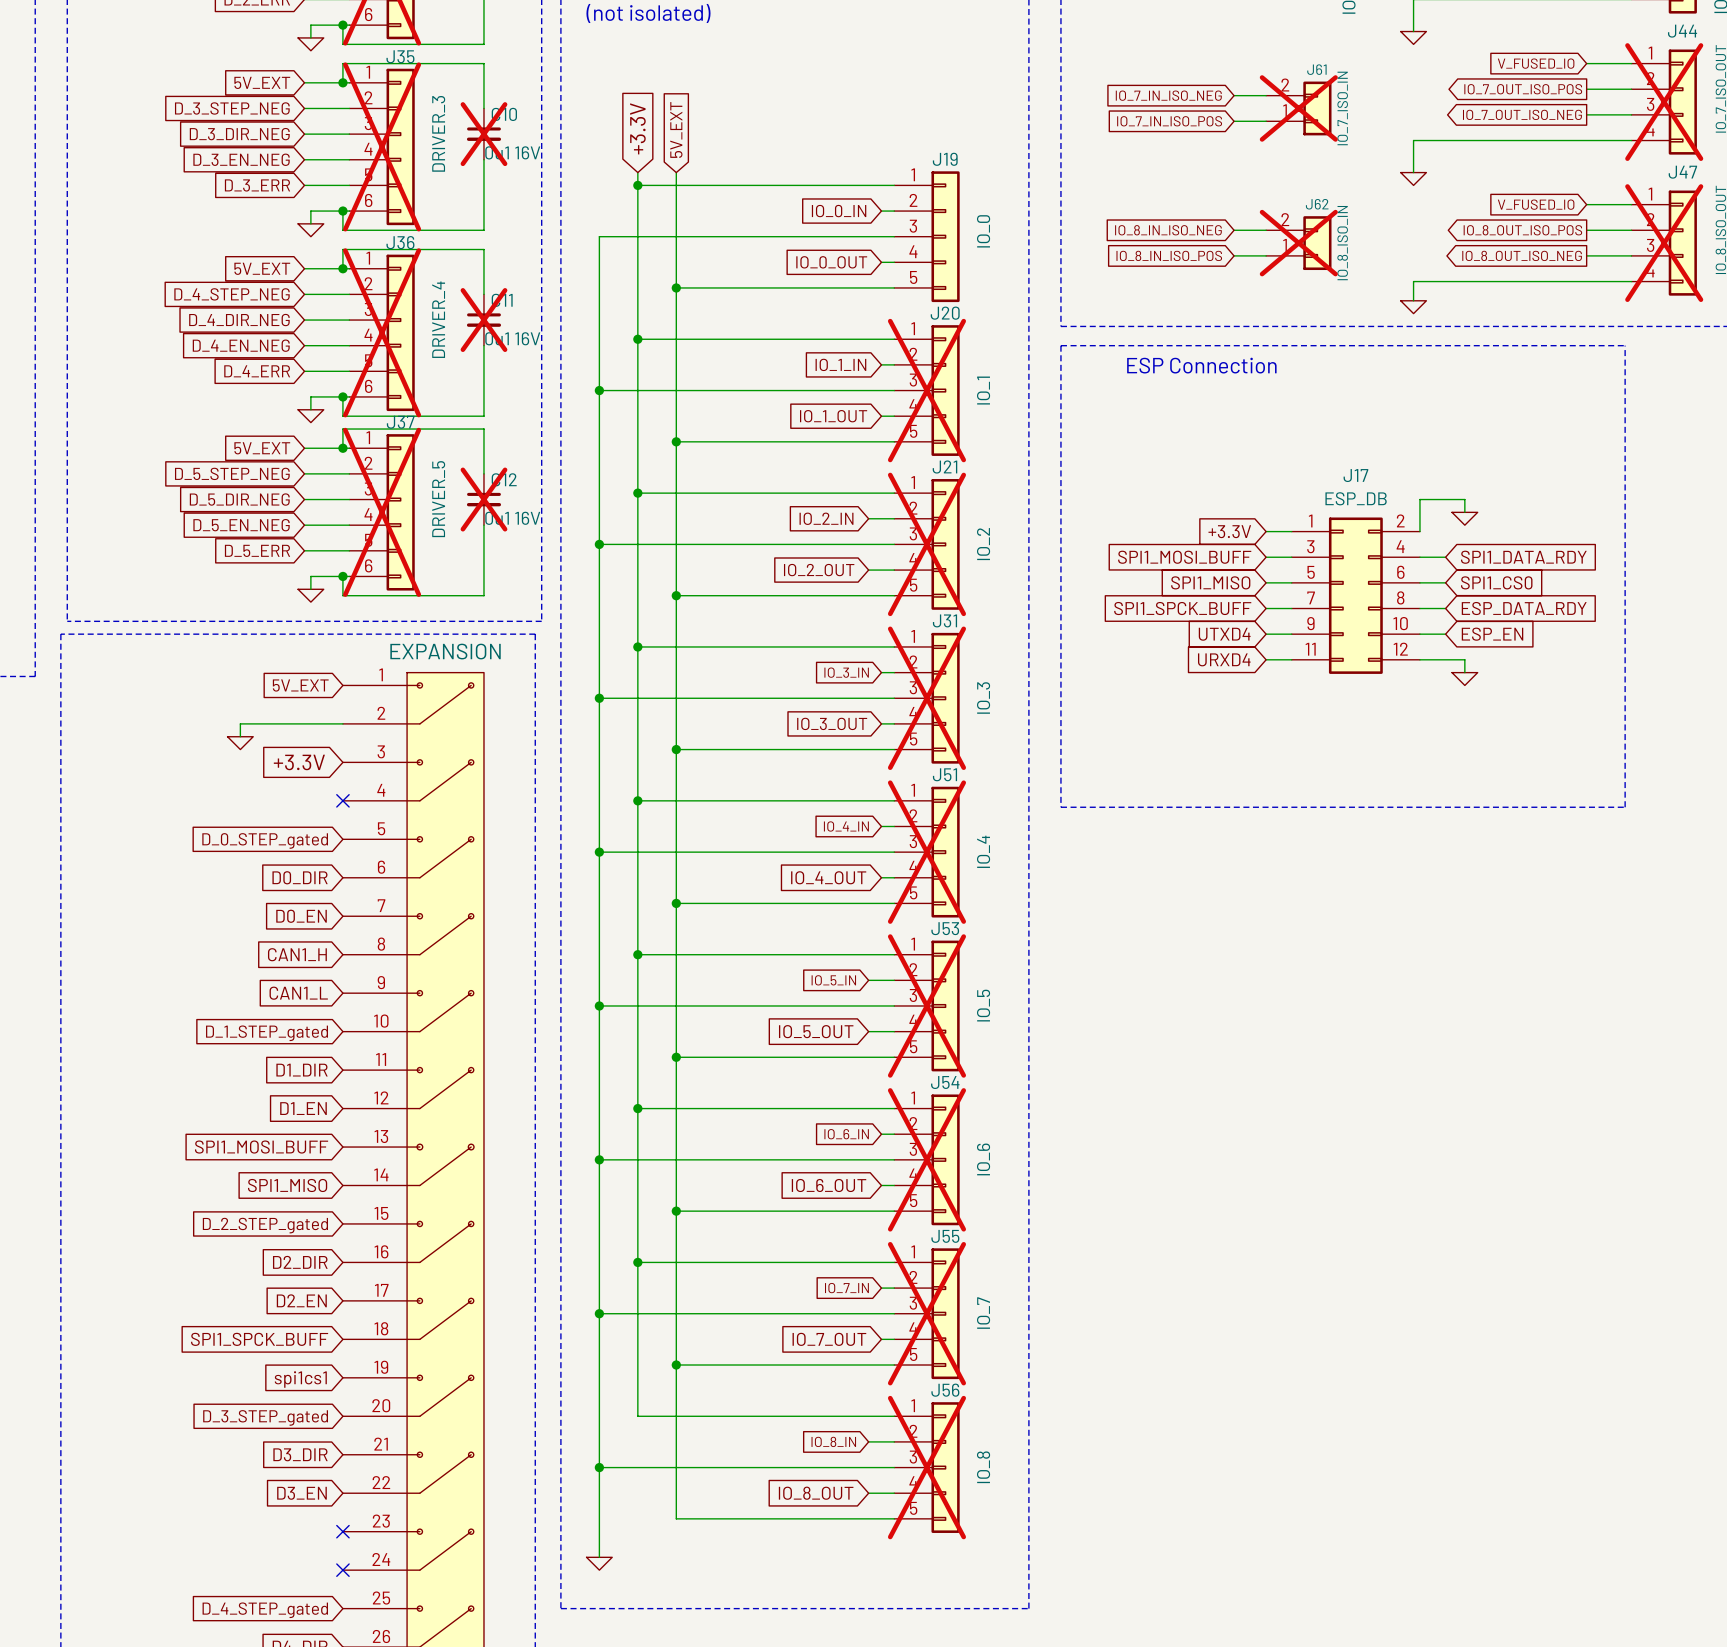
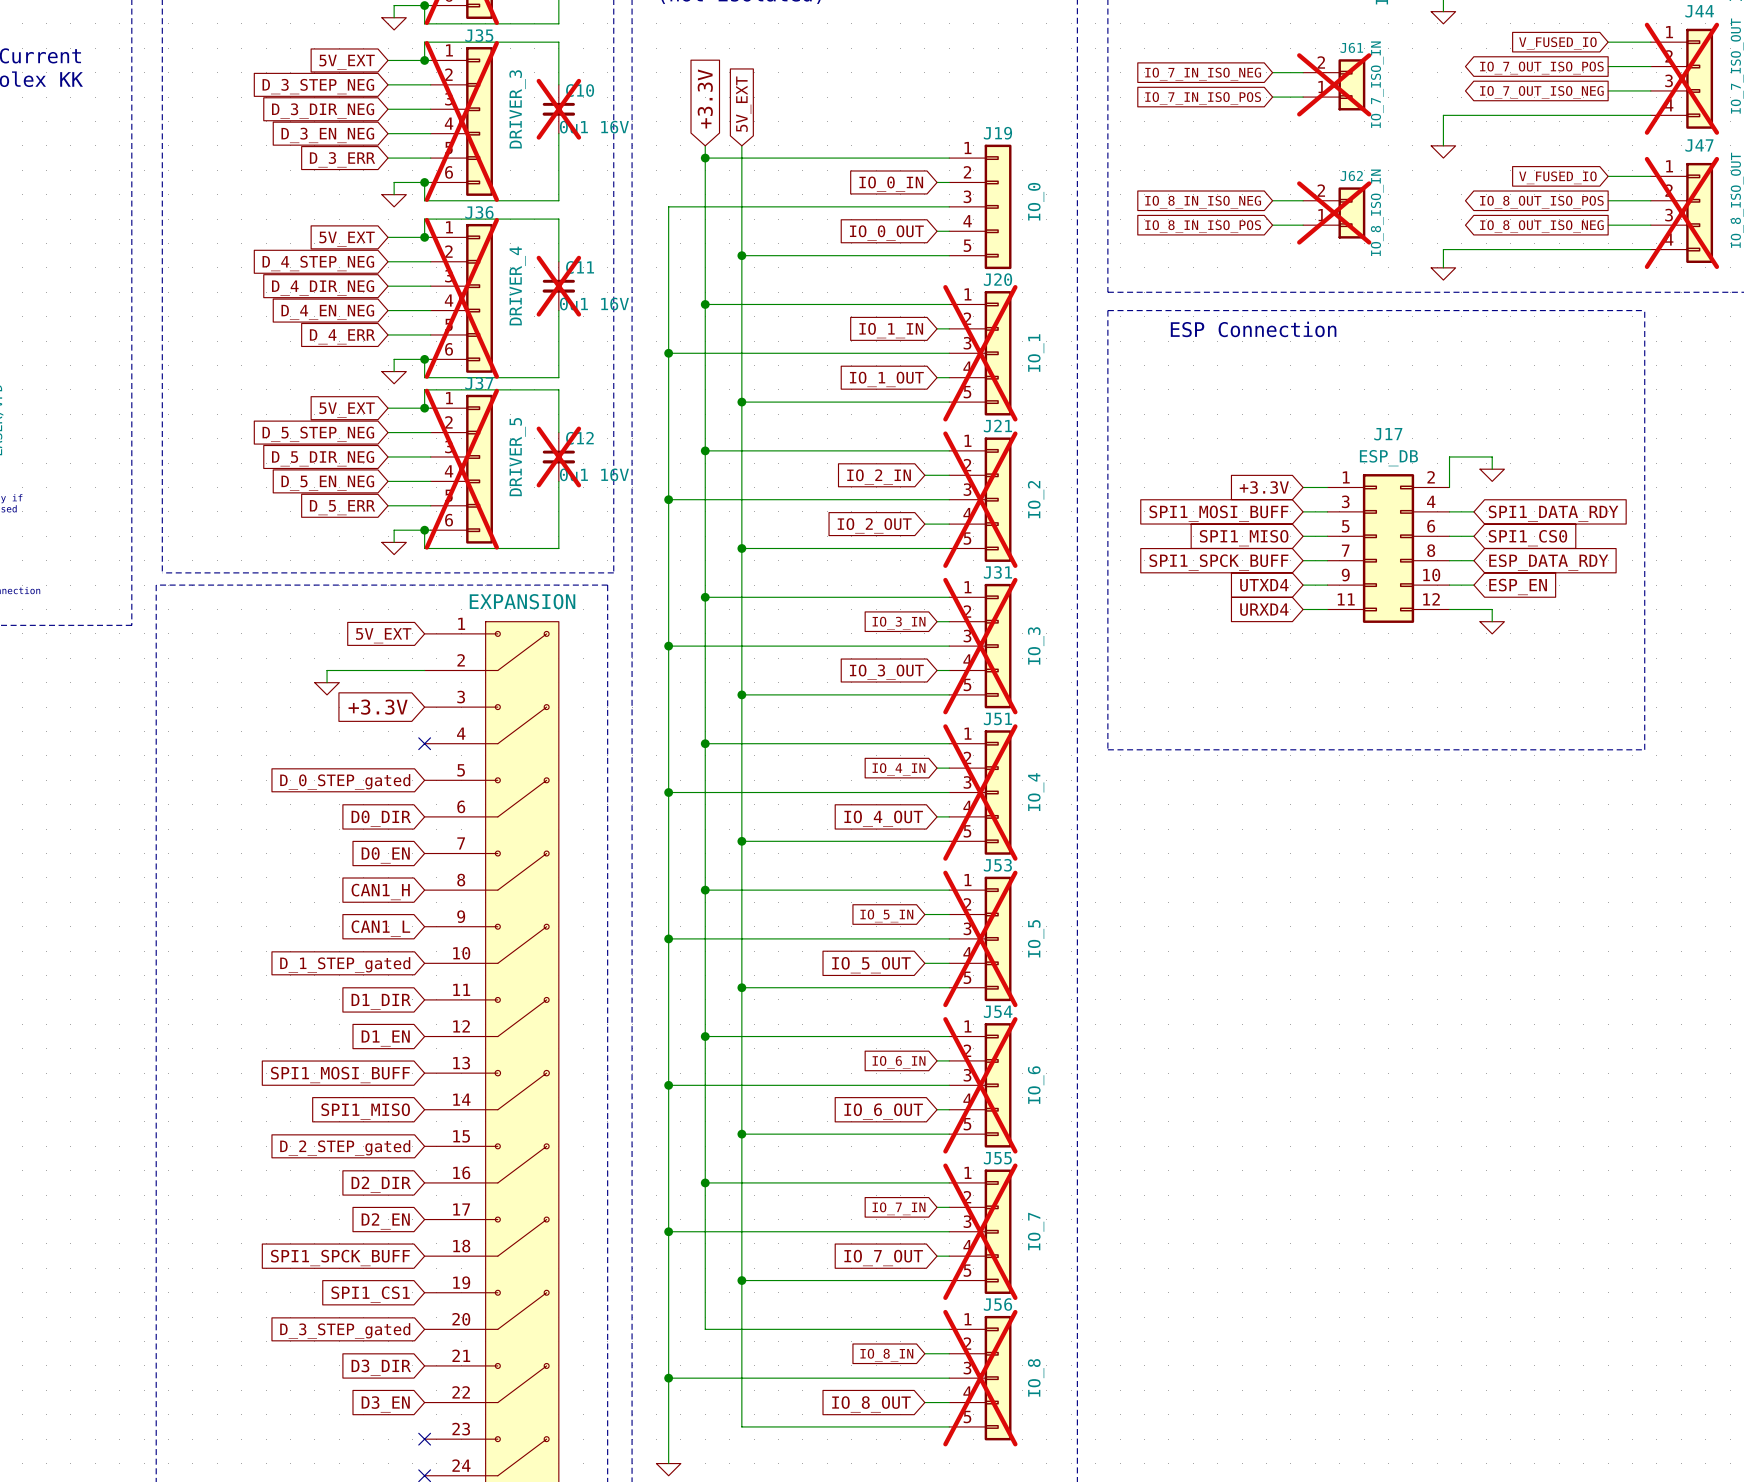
global label: spi1cs1 (300, 1379) -> SPI1_CS1 (370, 1294)

